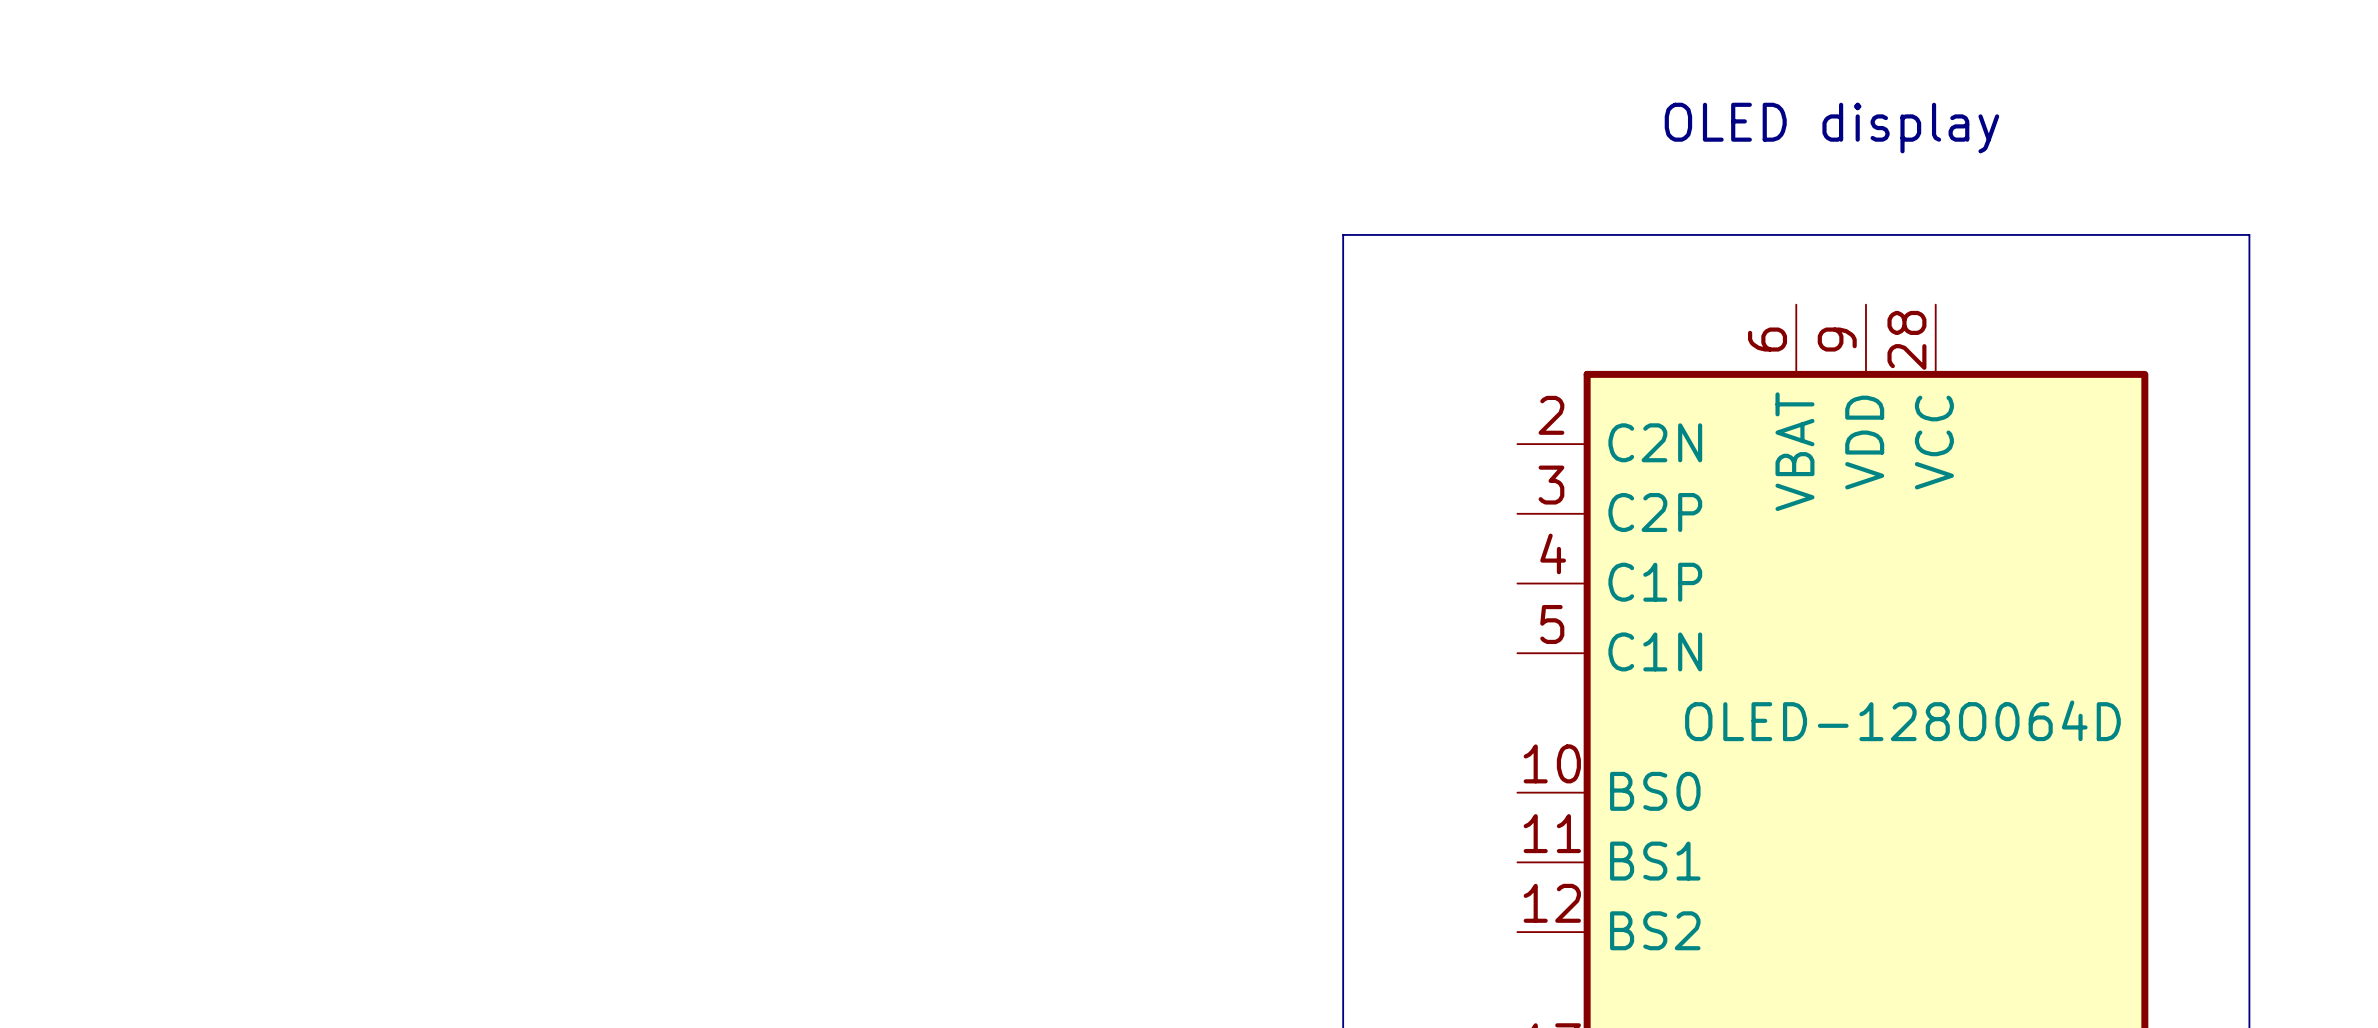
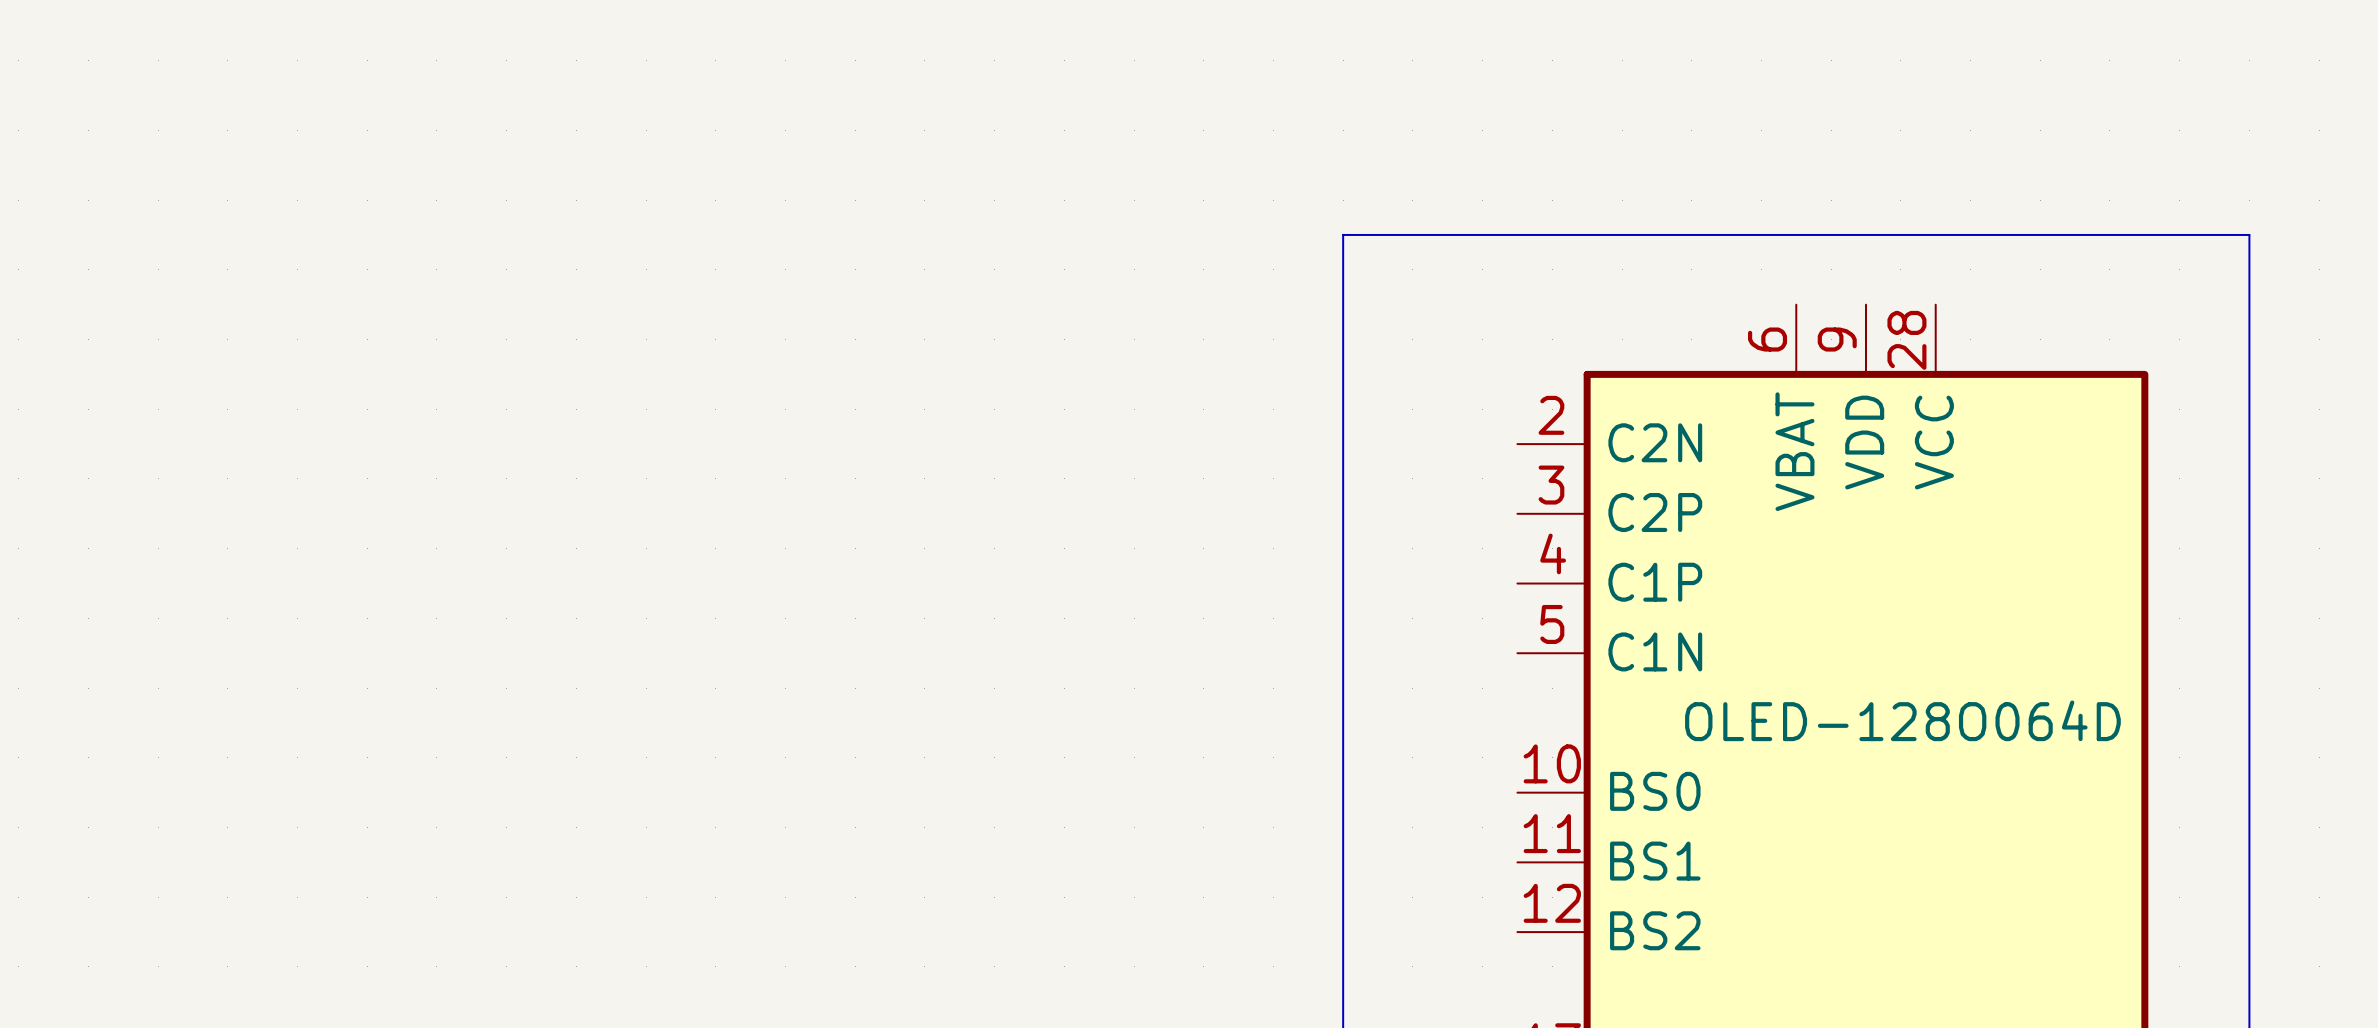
text: OLED display (1831, 128) -> none

